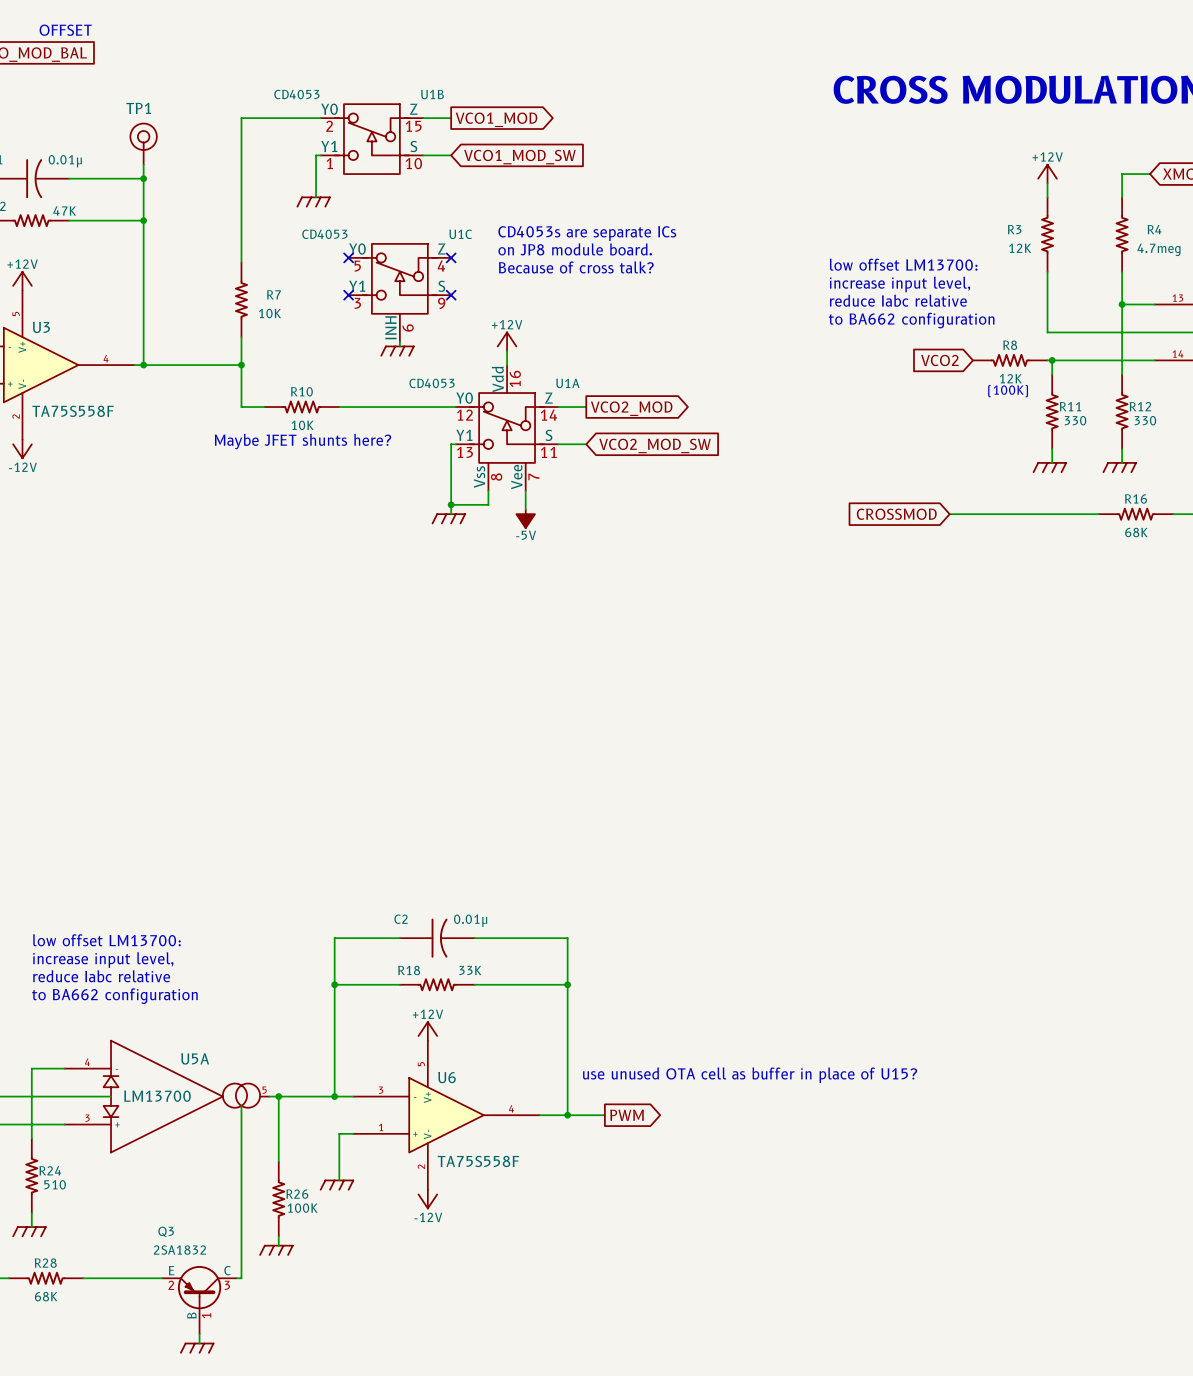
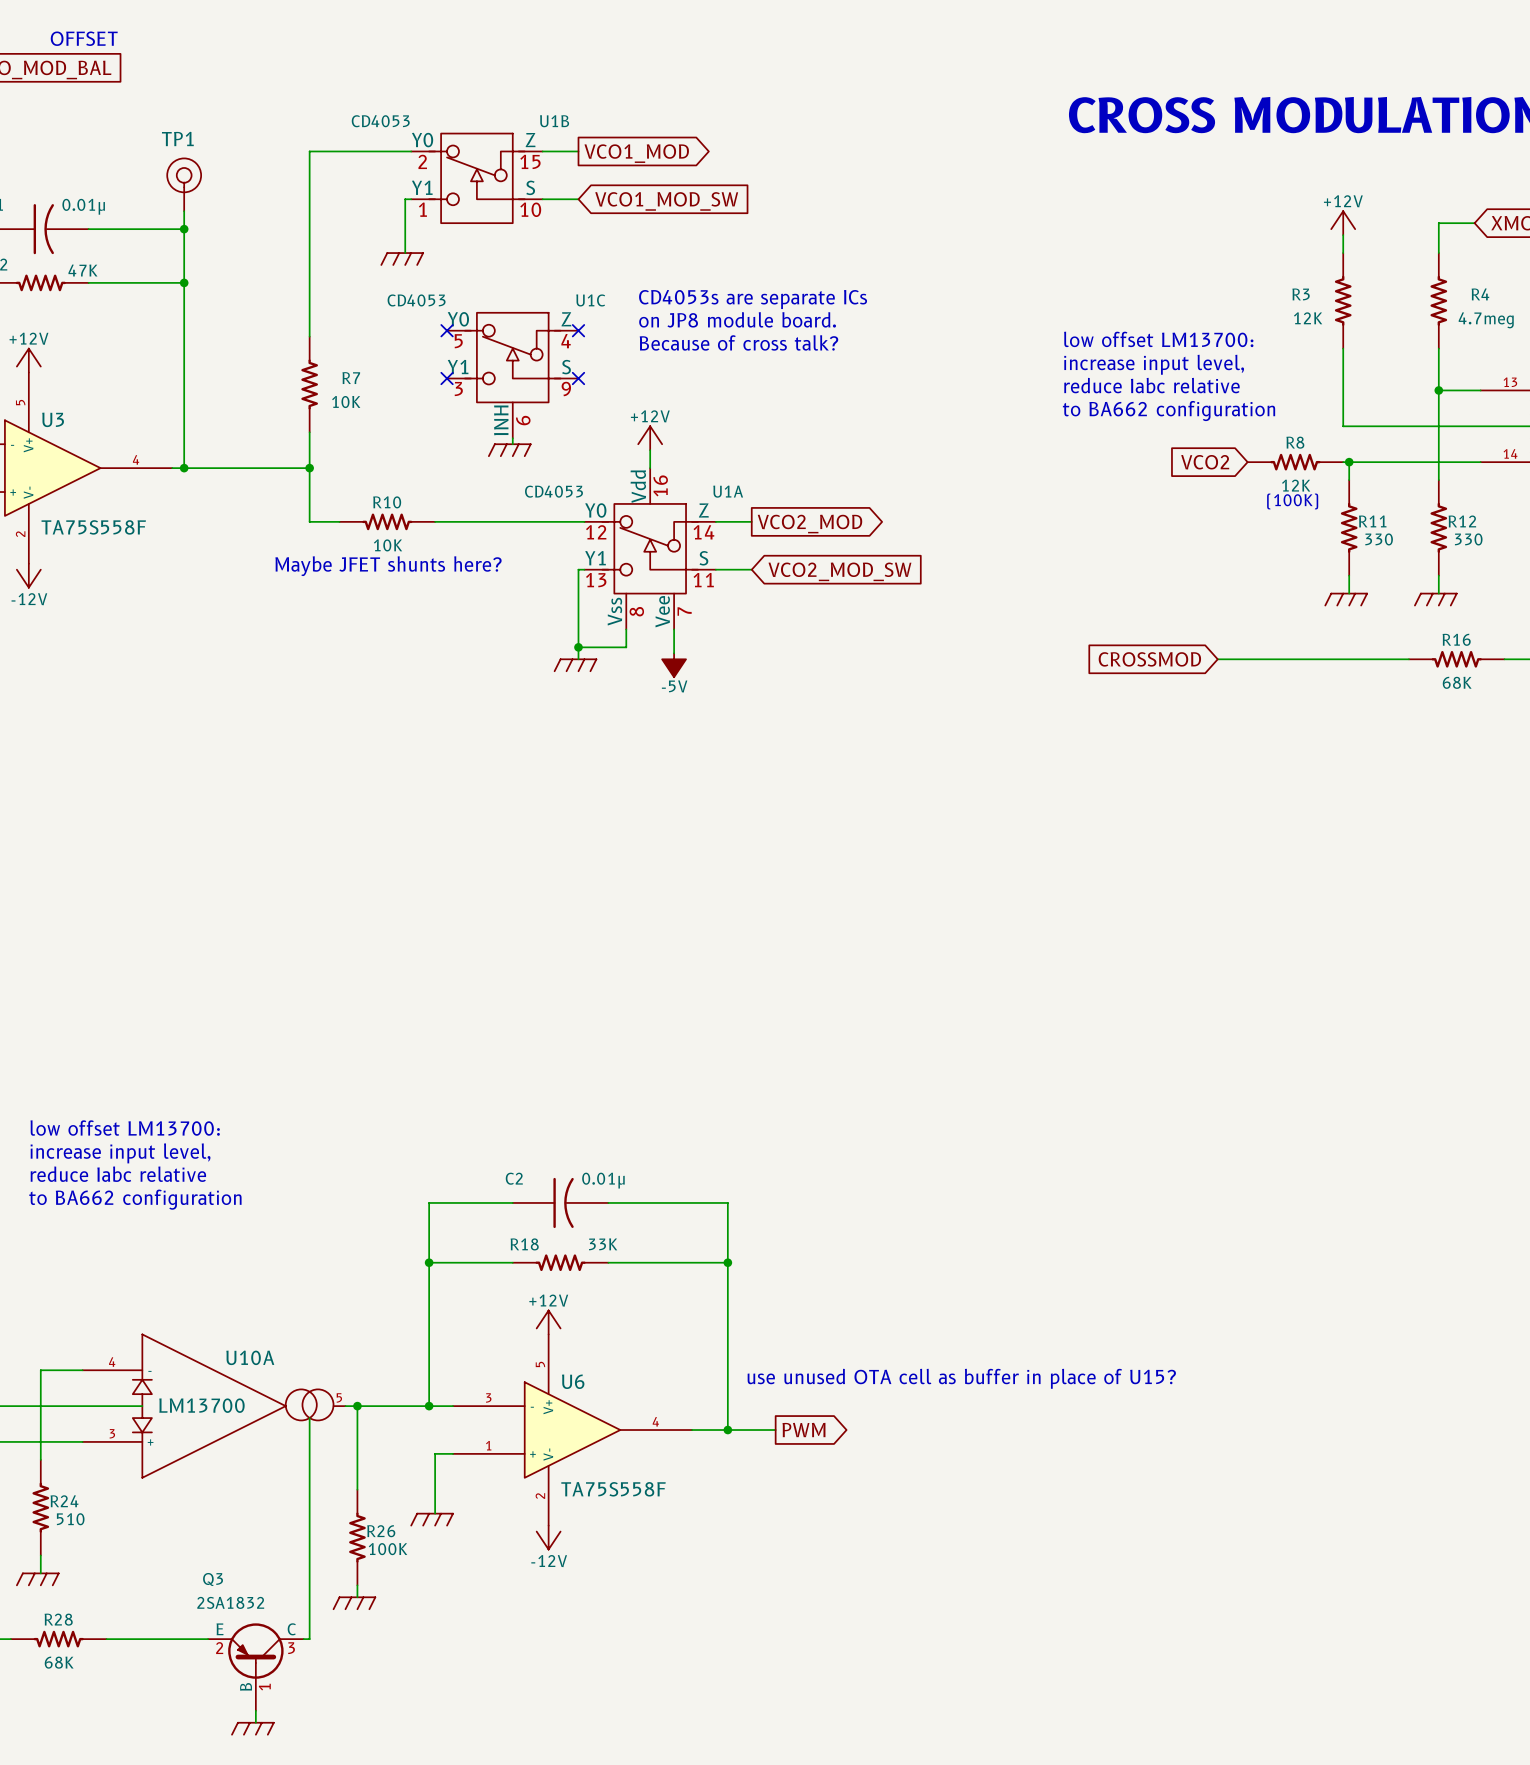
text position: low offset LM13700: (106, 940) -> low offset LM13700: (125, 1128)
text position: increase input level, (103, 960) -> increase input level, (120, 1153)
text position: reduce Iabc relative (101, 976) -> reduce Iabc relative (118, 1174)
text position: to BA662 configuration (114, 996) -> to BA662 configuration (135, 1199)
U5A name: U5A (195, 1058) -> U10A (250, 1357)

